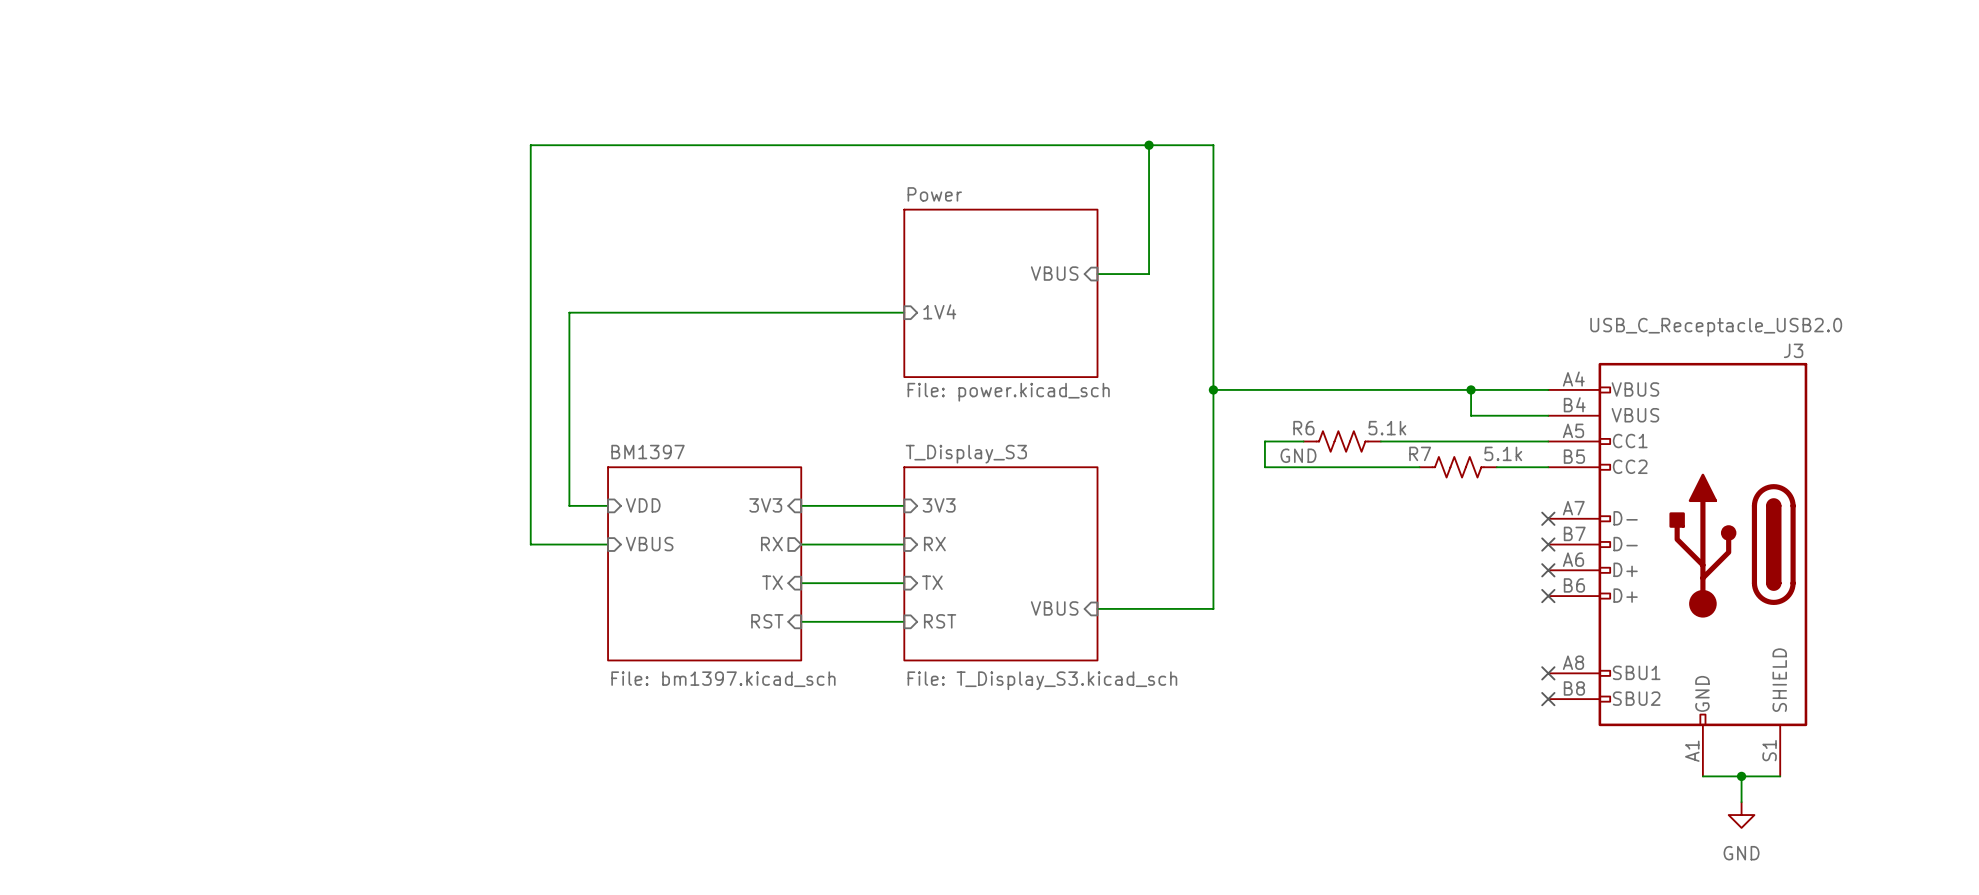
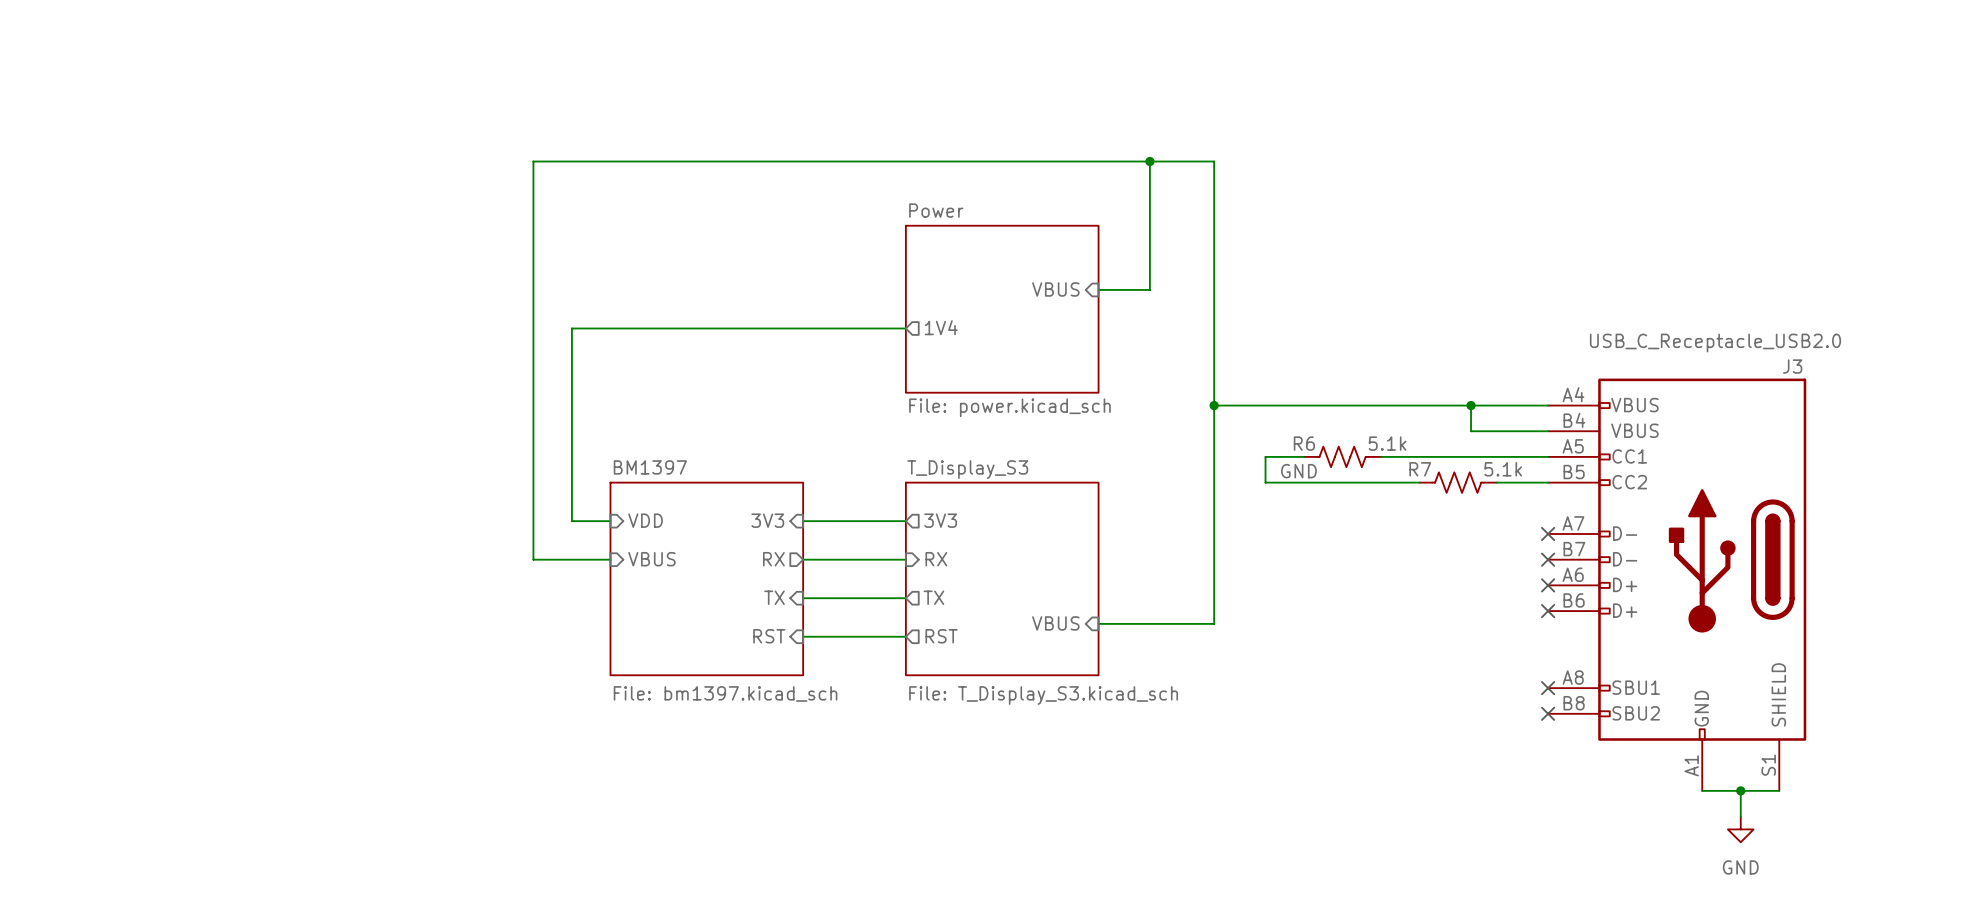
sheet pin shape: input (939, 311) -> output (941, 327)
sheet pin shape: input (939, 505) -> output (940, 520)
sheet pin shape: input (932, 582) -> output (933, 597)
sheet pin shape: input (940, 621) -> output (941, 636)

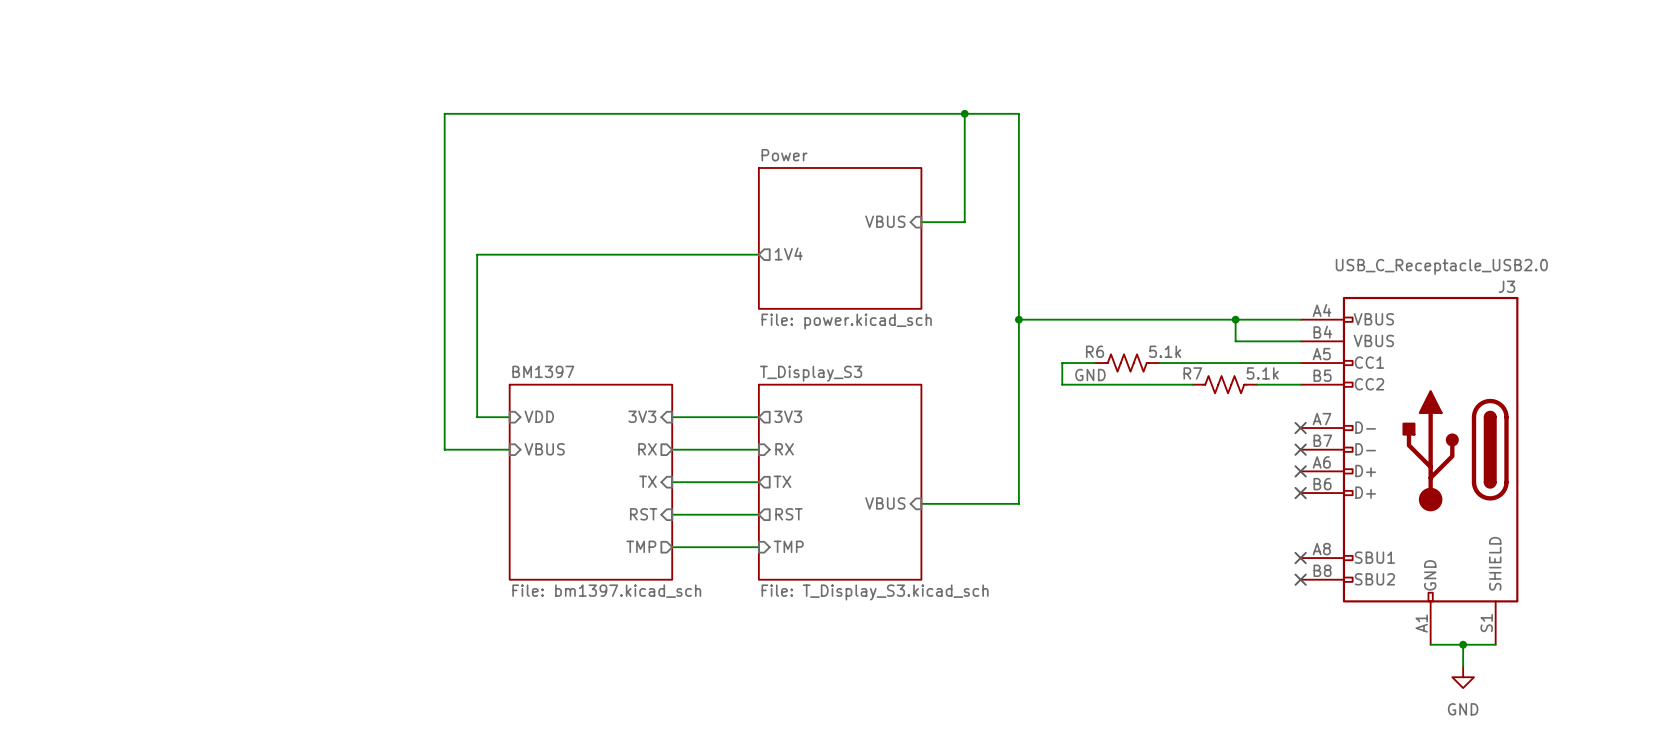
sheet BM1397 shape: [609, 481, 804, 677] -> [509, 384, 673, 581]
sheet T_Display_S3 shape: [905, 481, 1100, 677] -> [758, 384, 923, 581]
sheet pin: none -> TMP (641, 546)
sheet pin: none -> TMP (788, 546)
wire: none -> (672, 547) (758, 547)

